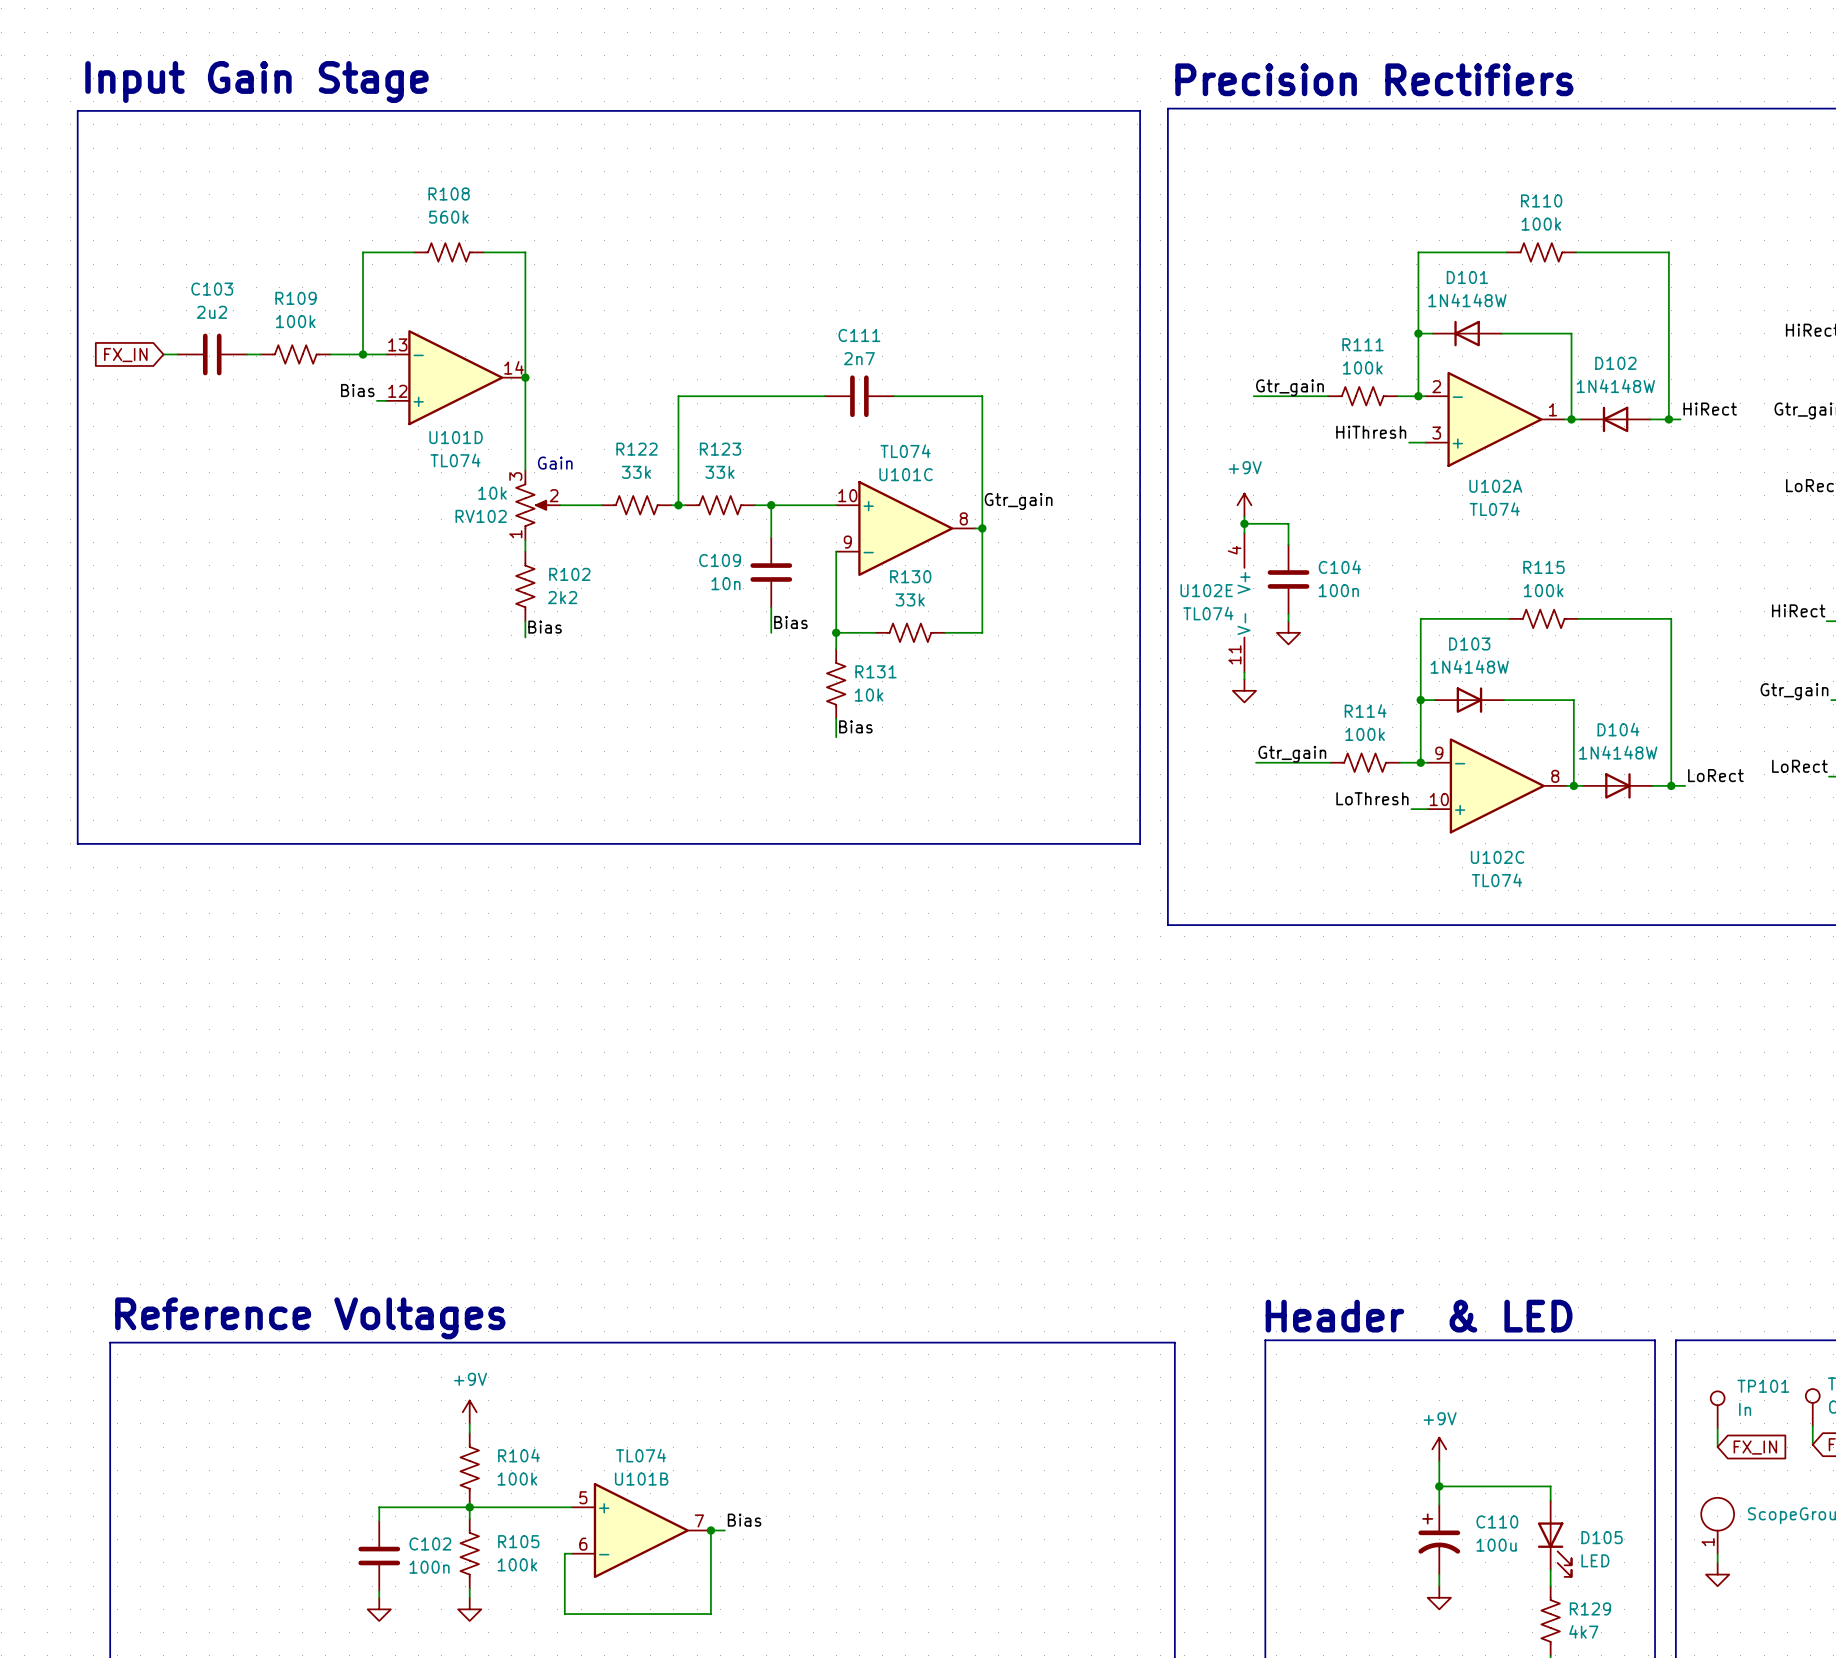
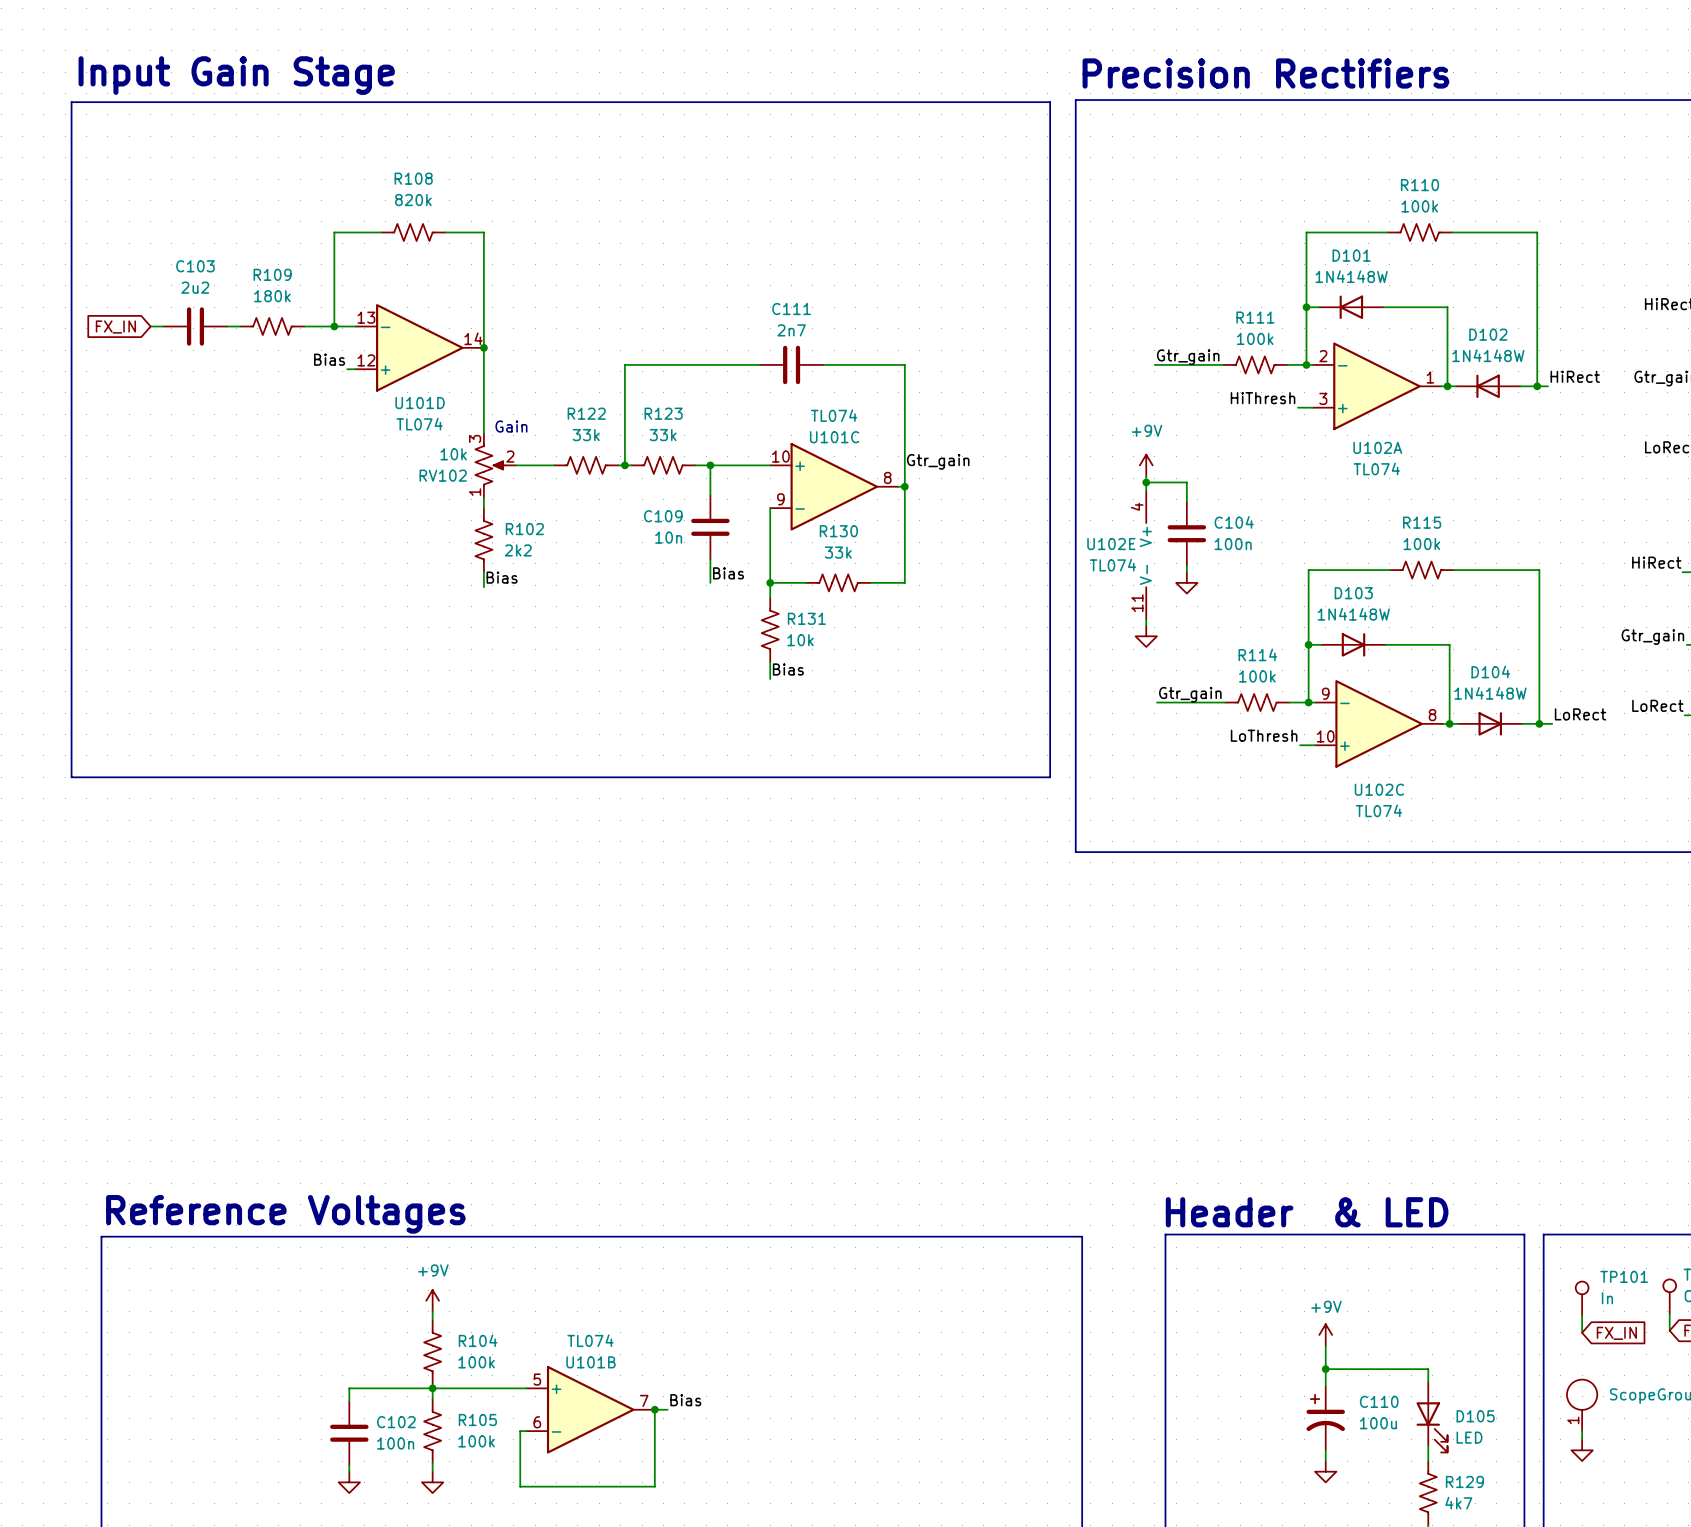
R108 value: 560k (448, 217) -> 820k (413, 200)
R109 value: 100k (295, 321) -> 180k (272, 296)

